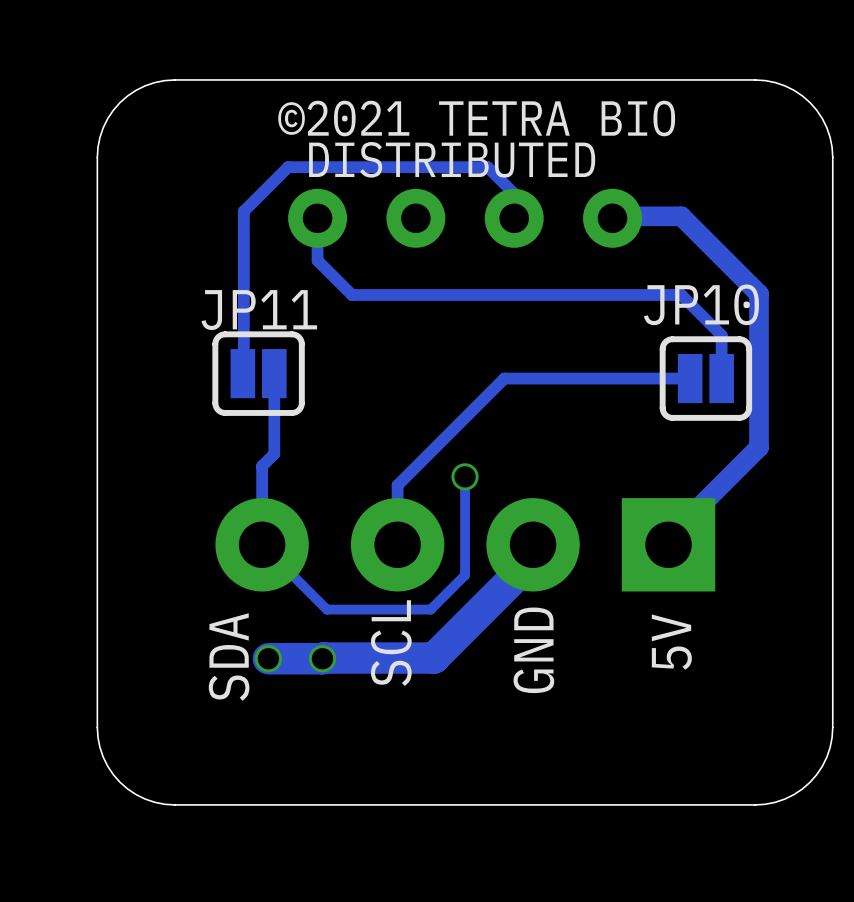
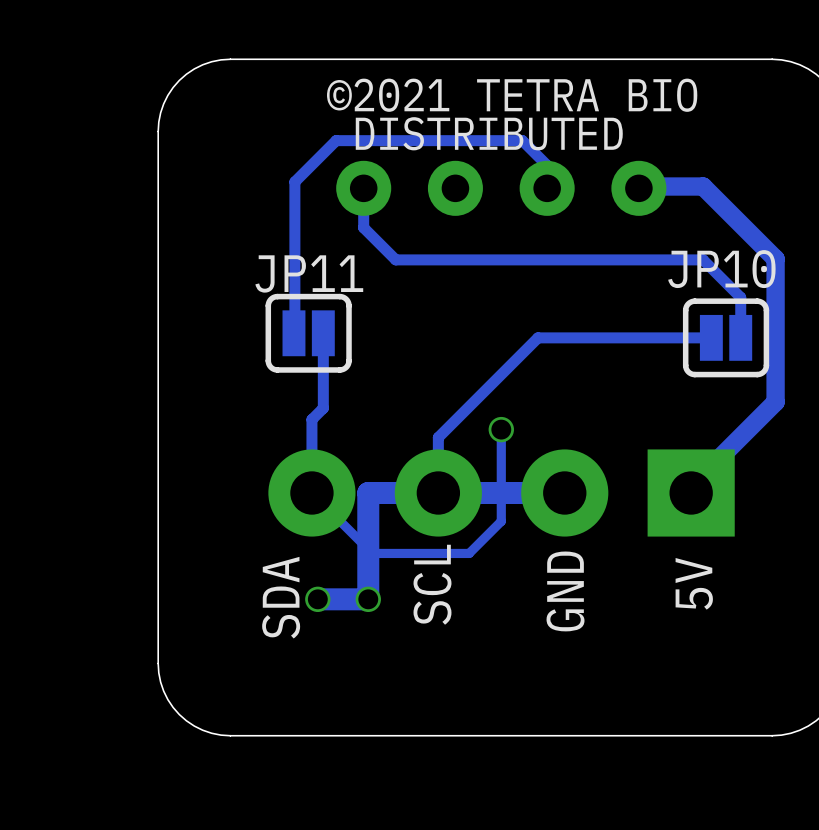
track: (533, 544) (533, 558) (434, 658) (322, 658) -> (564, 492) (368, 492) (368, 599)
track width: thick (322, 658) (268, 658) -> thin (368, 599) (317, 599)

